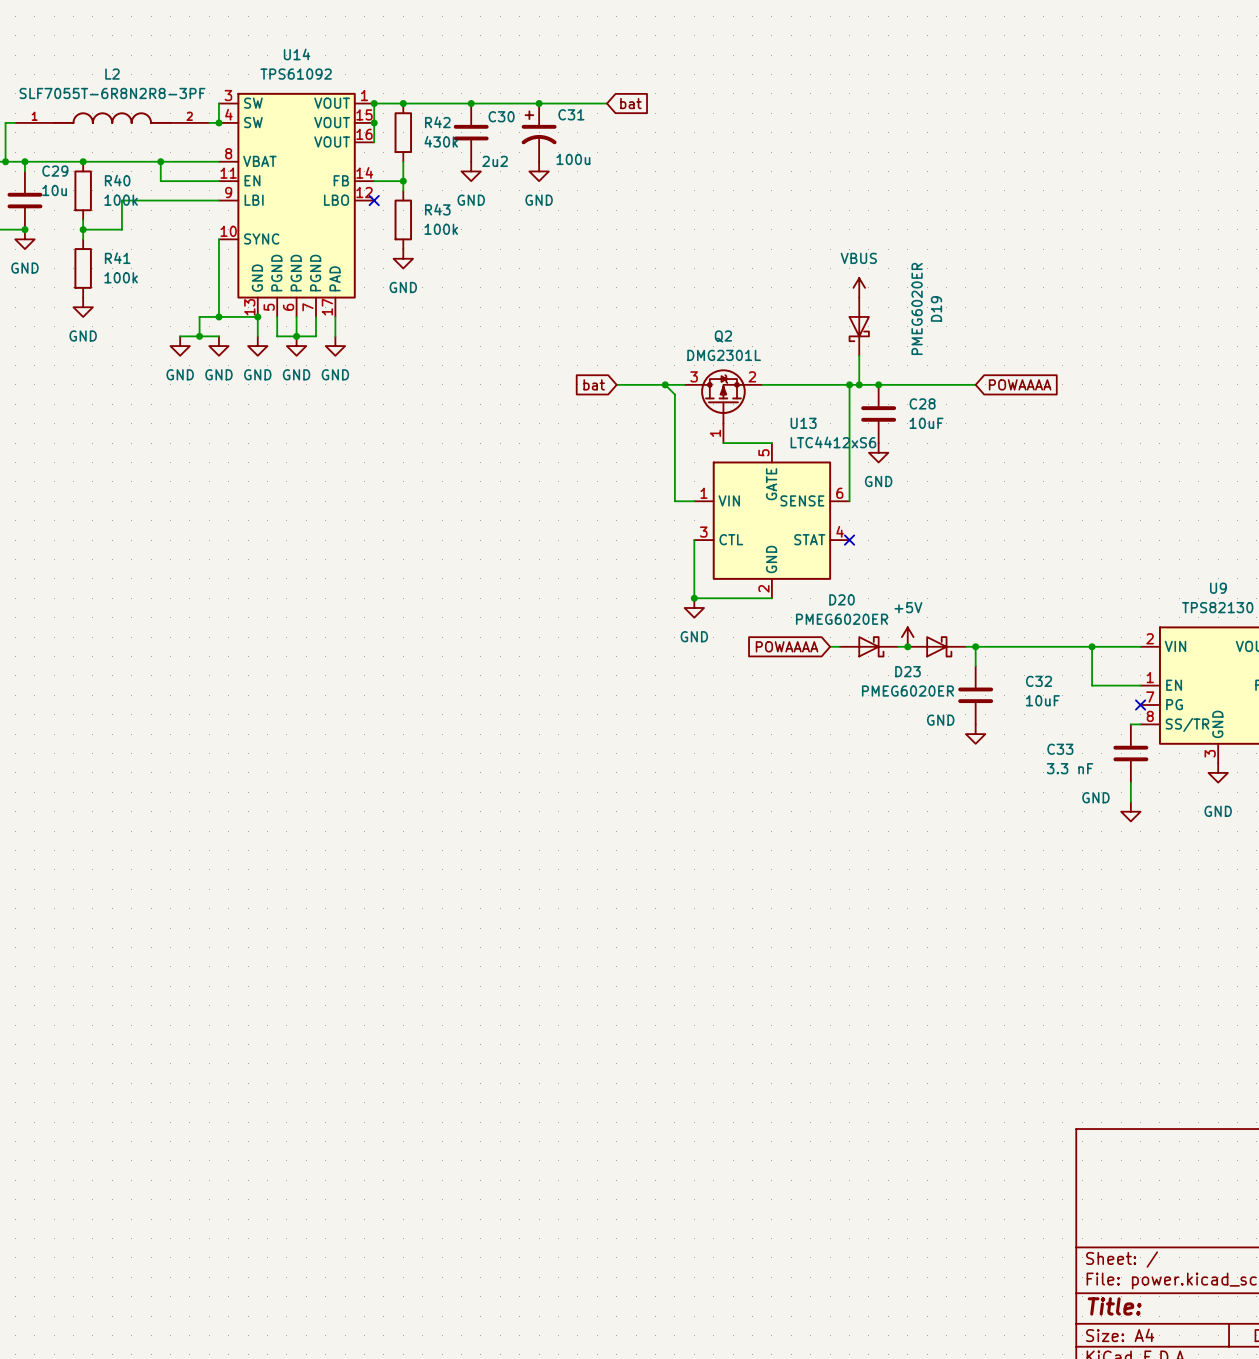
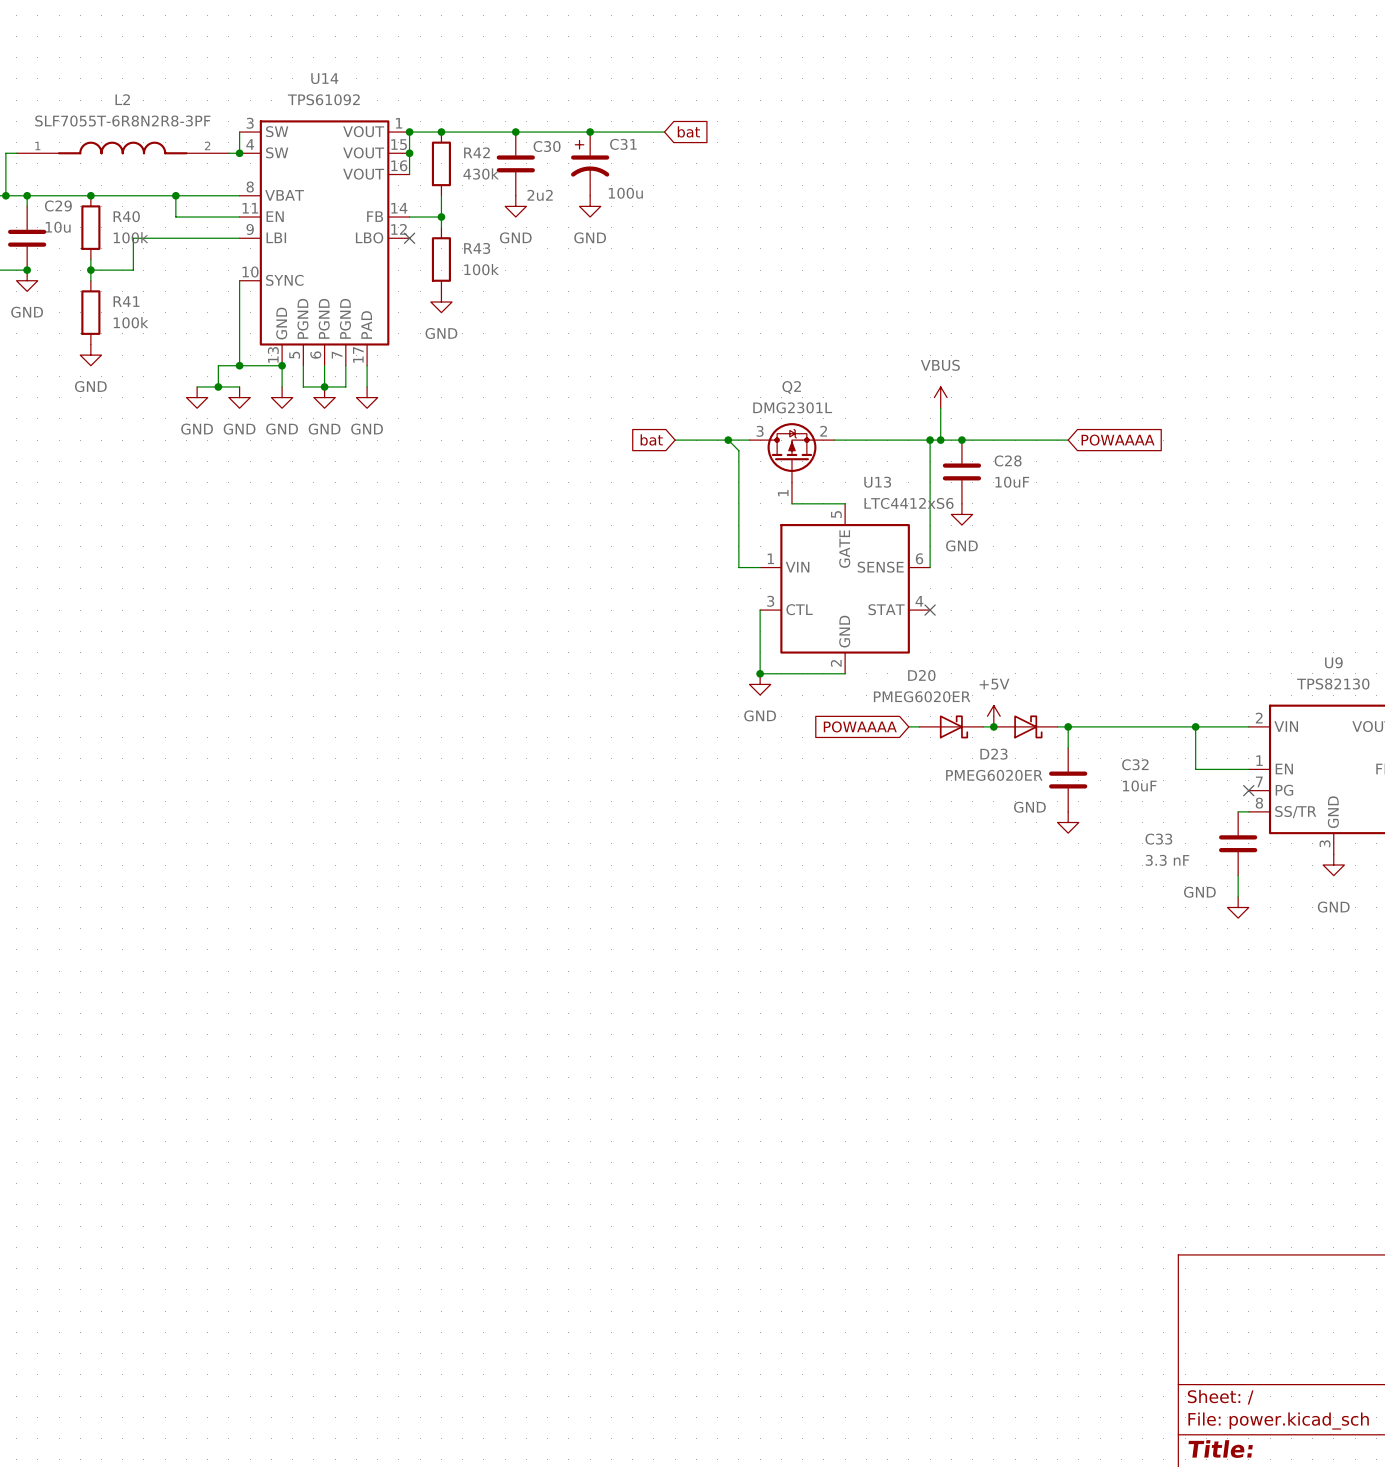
power symbol position: VBUS (859, 287) -> VBUS (940, 397)
D19: PMEG6020ER (859, 326) -> none

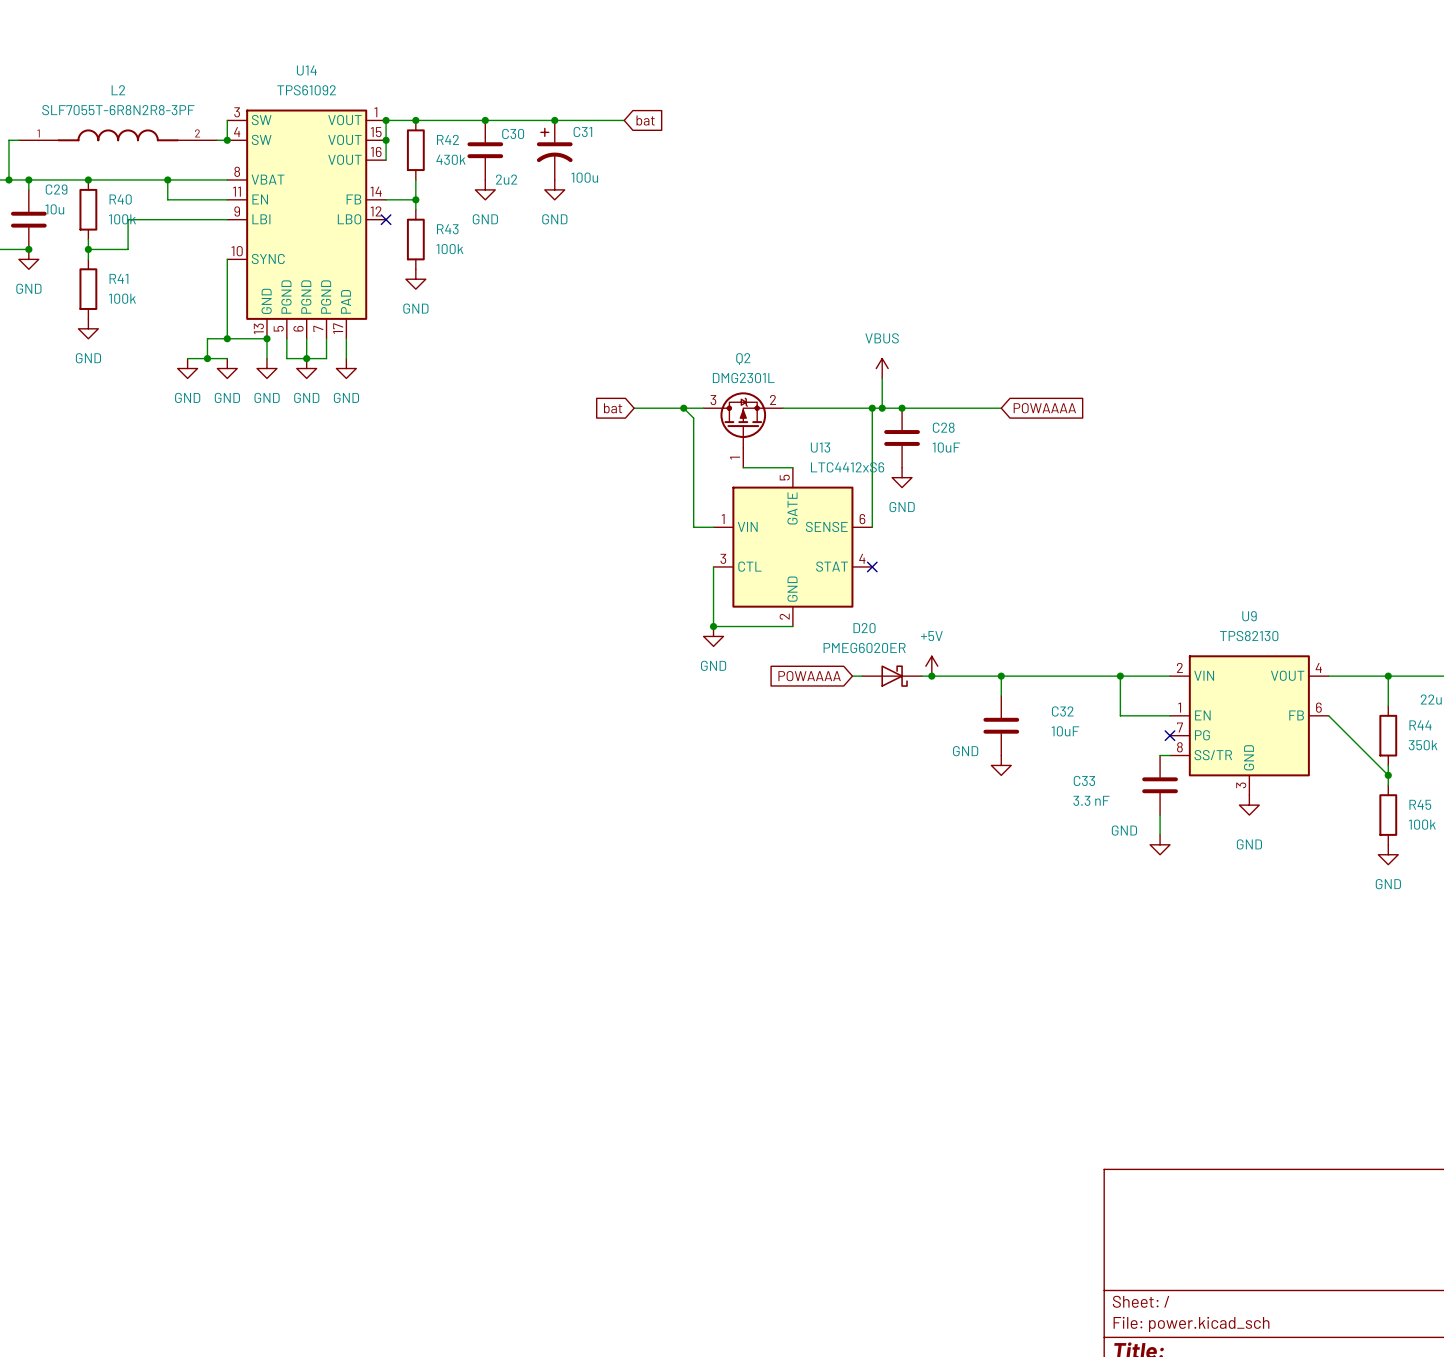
D23: PMEG6020ER (1025, 726) -> none

